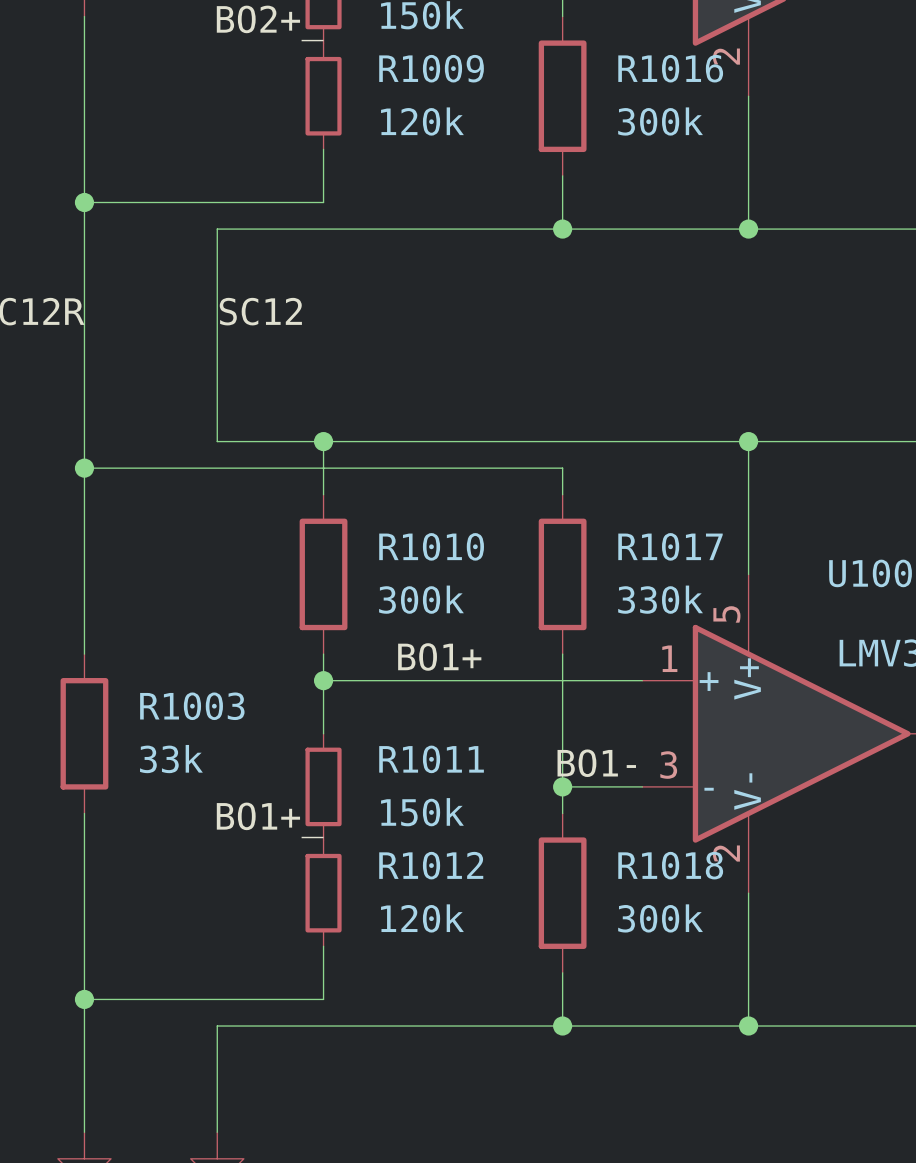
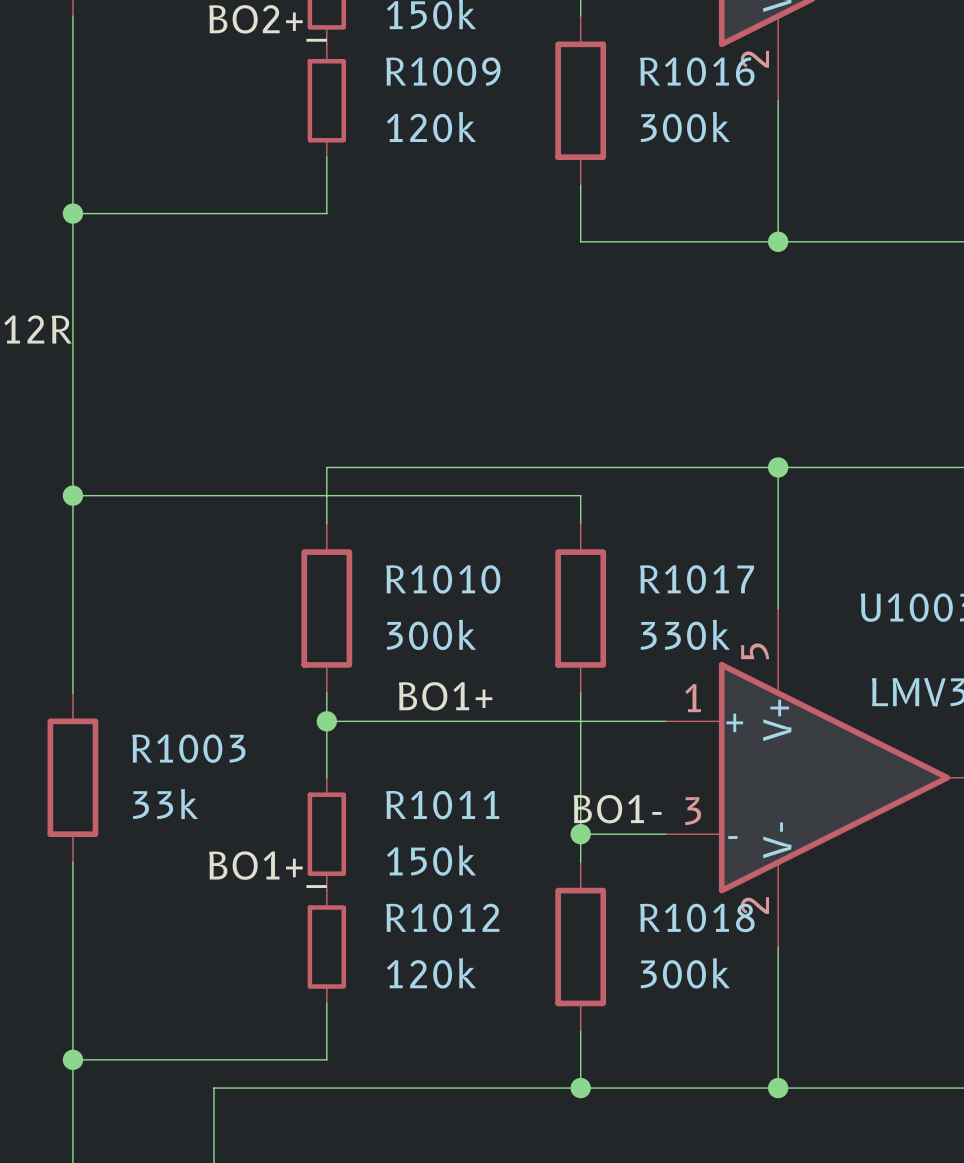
wire: (562, 229) (217, 229) (217, 441) (323, 441) -> none
junction: (562, 229) -> none
label: SC12 (260, 311) -> none
junction: (323, 441) -> none

